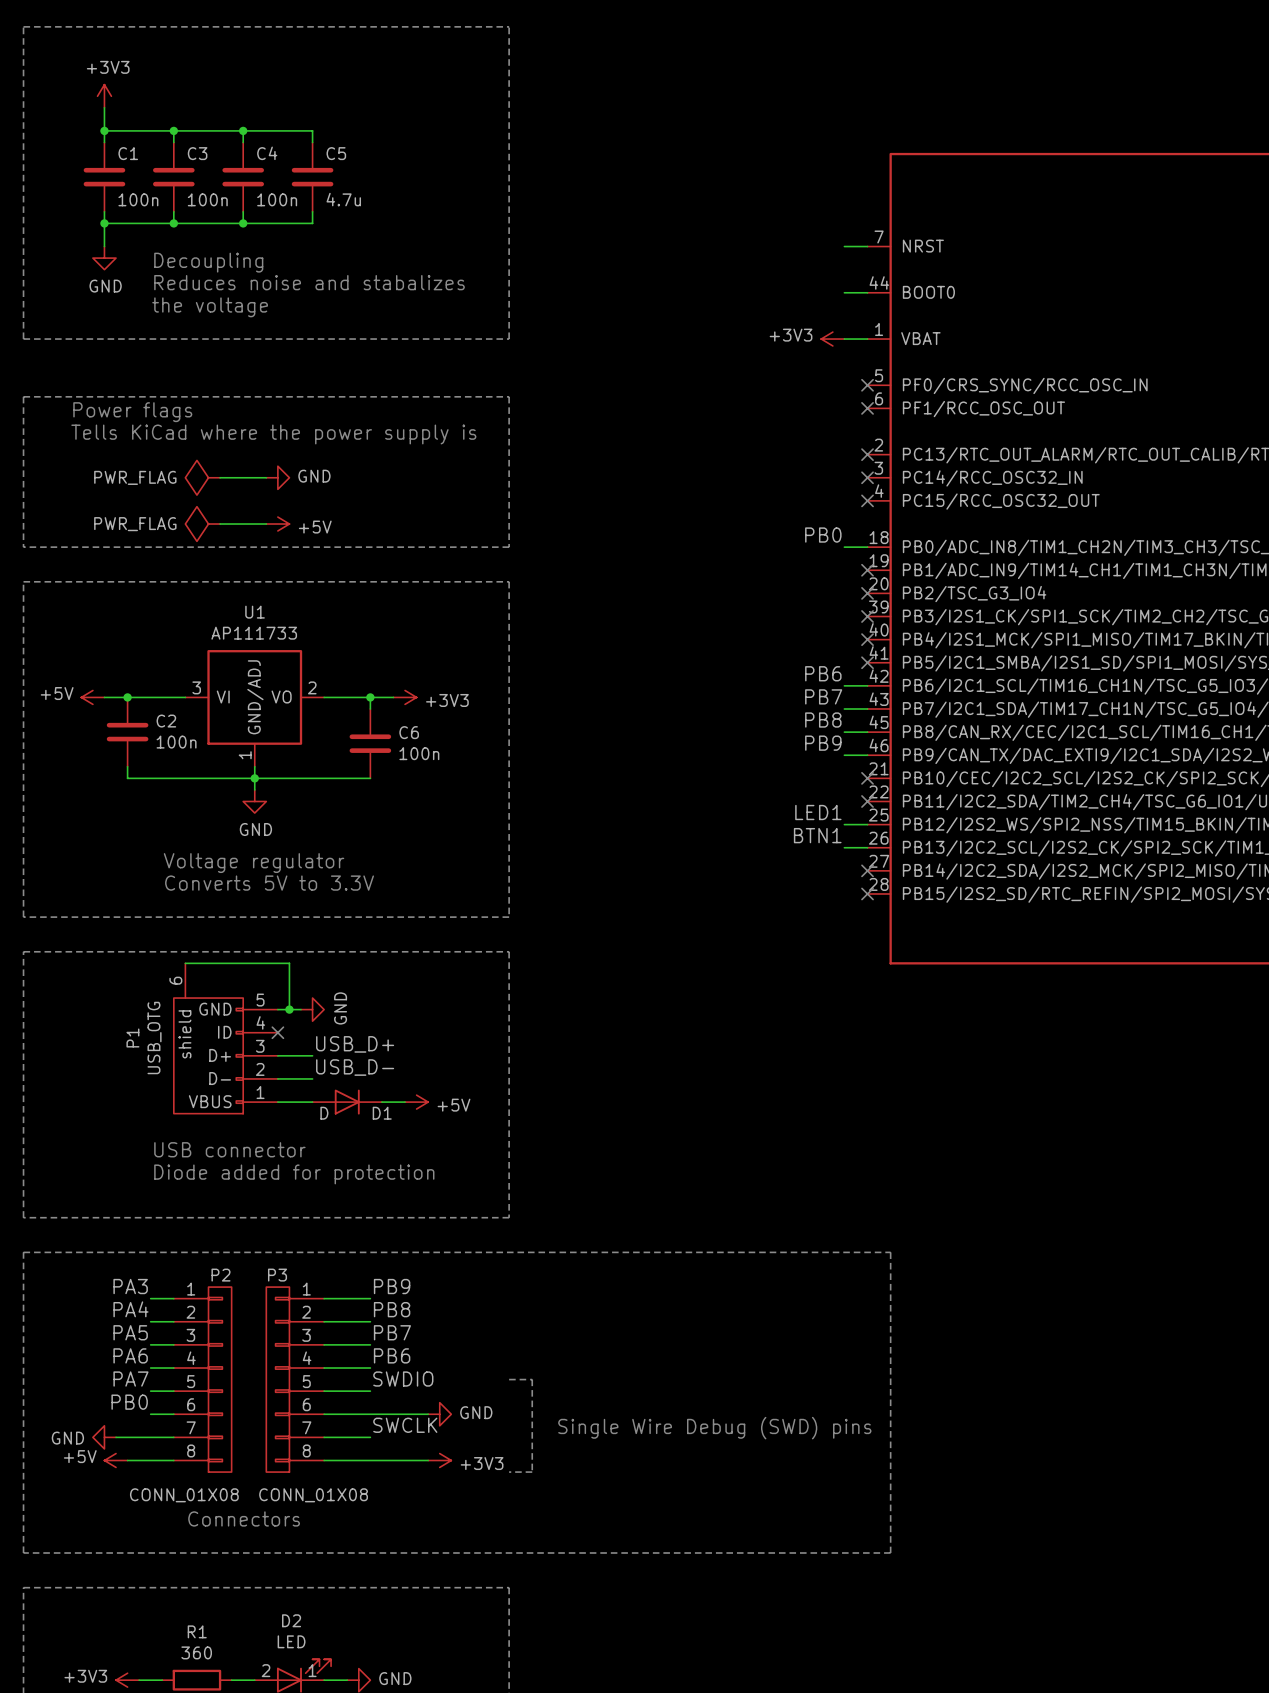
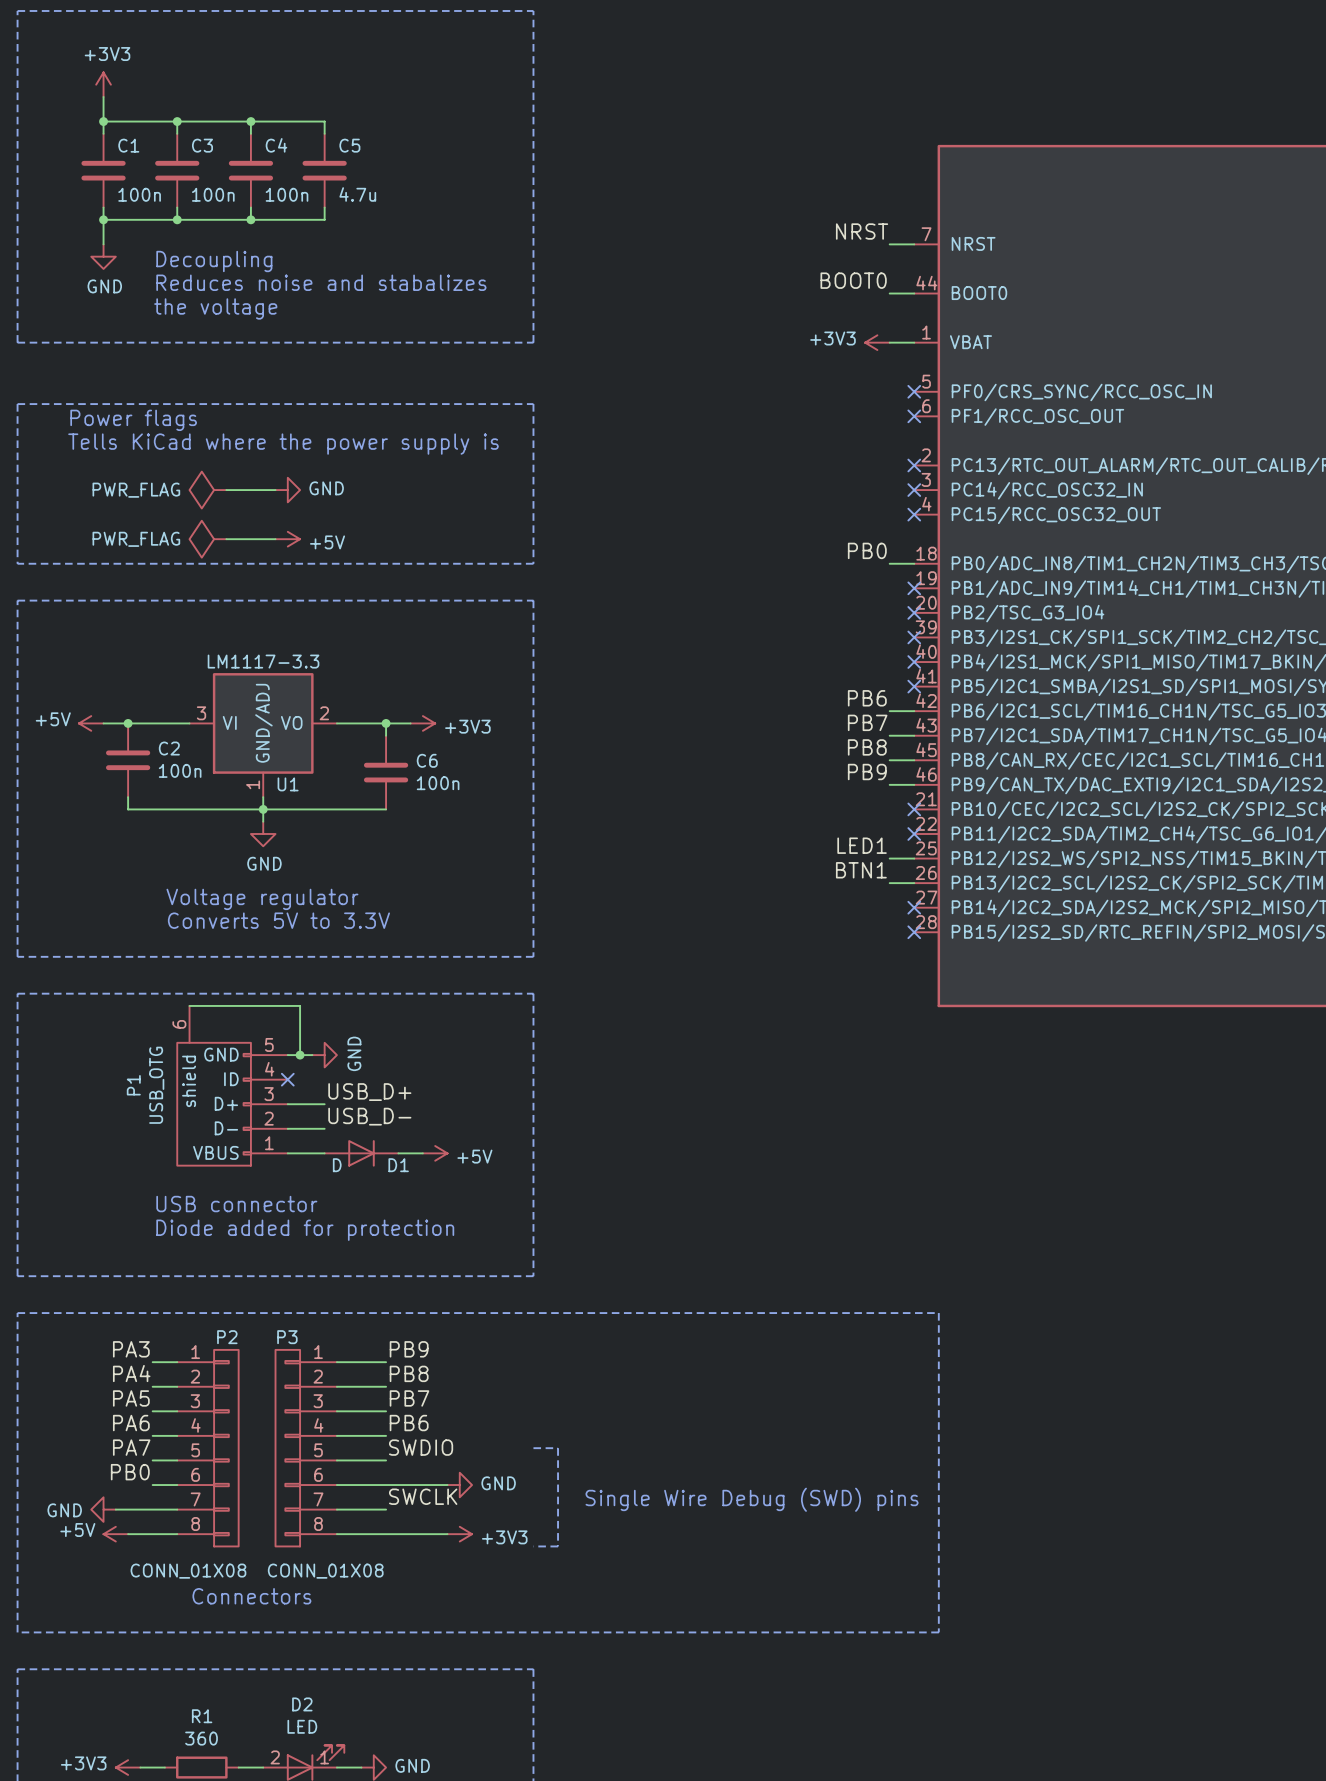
label: none -> NRST (862, 231)
label: none -> BOOT0 (853, 280)
U1 name position: U1 (255, 612) -> U1 (288, 784)
U1 value: AP111733 (254, 633) -> LM1117-3.3 (263, 661)

